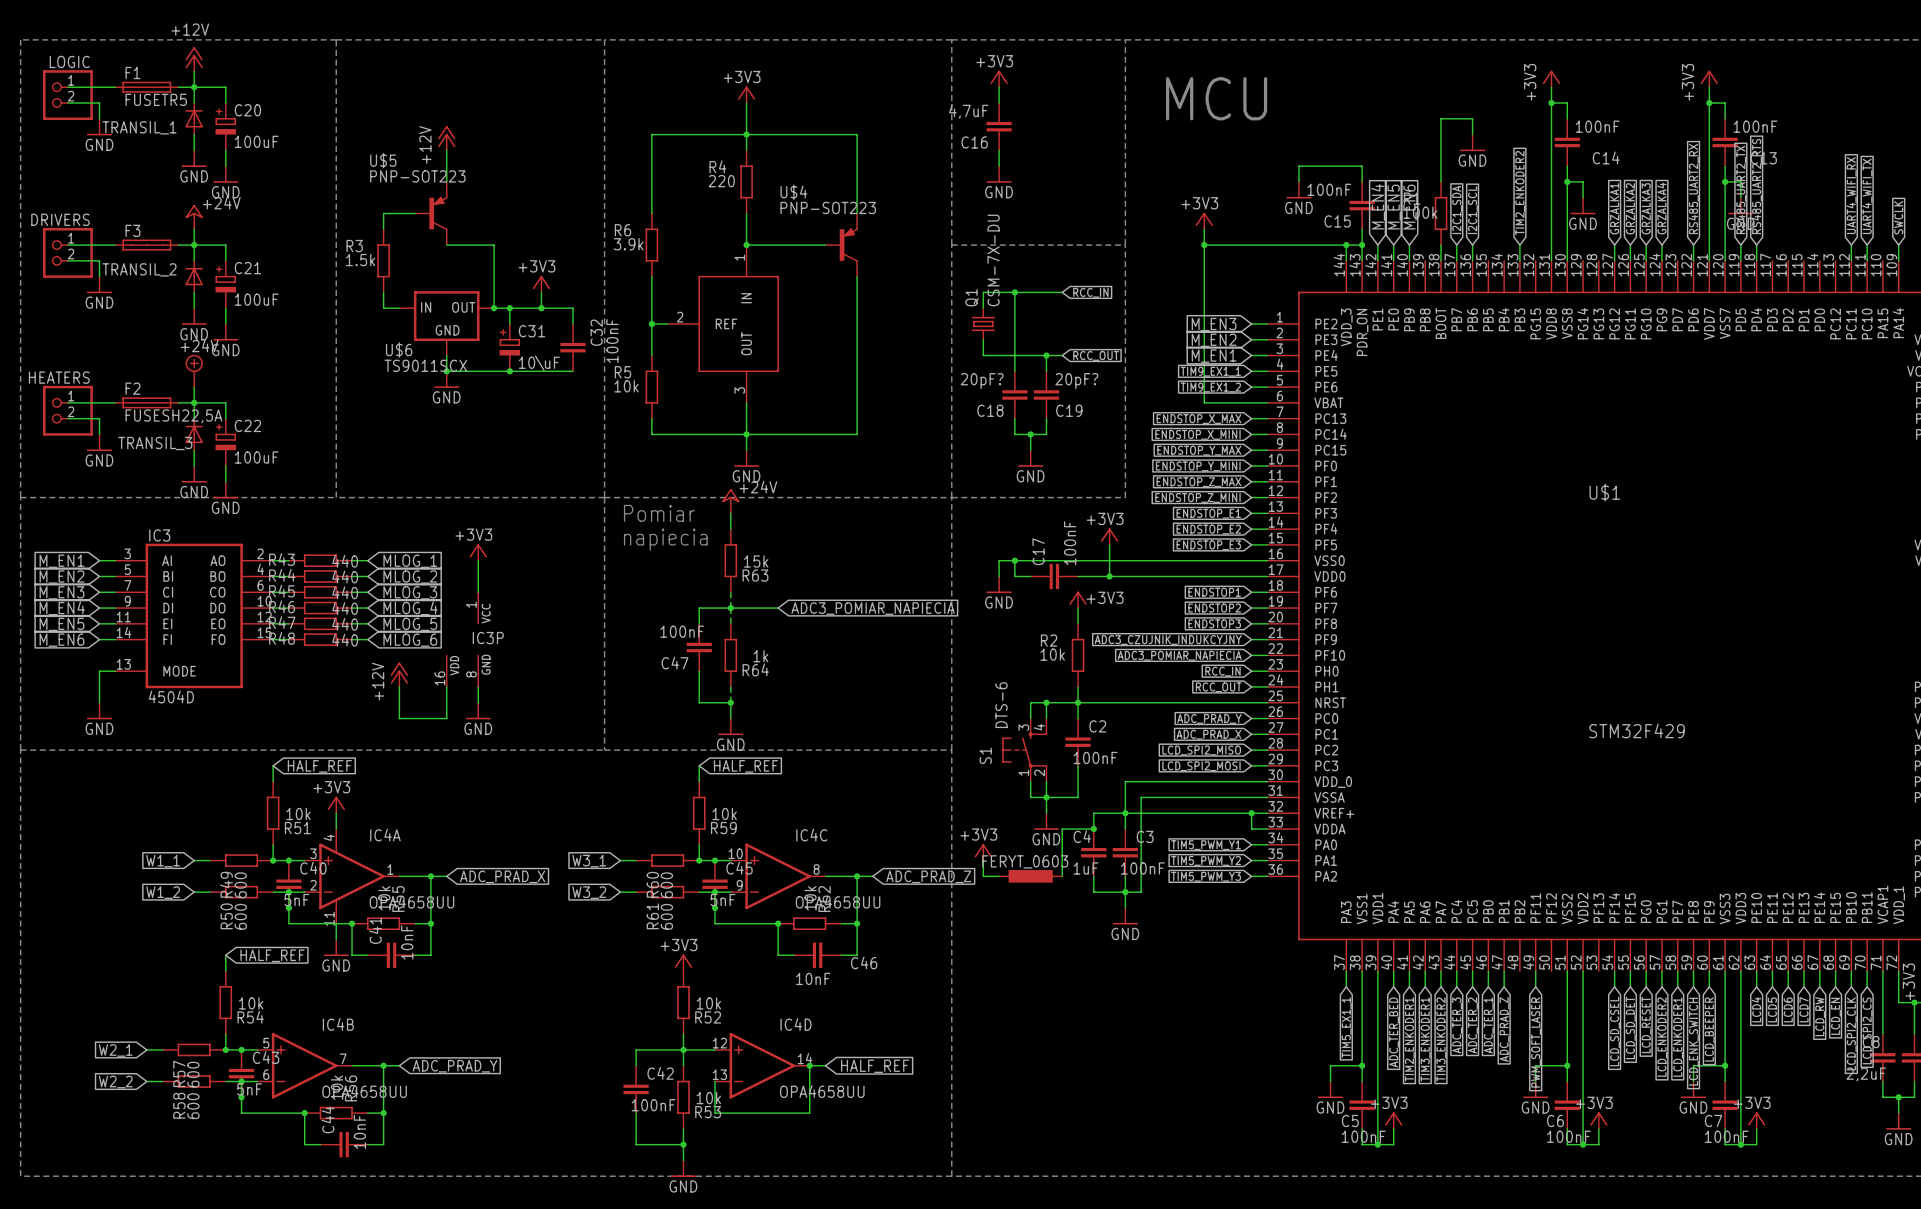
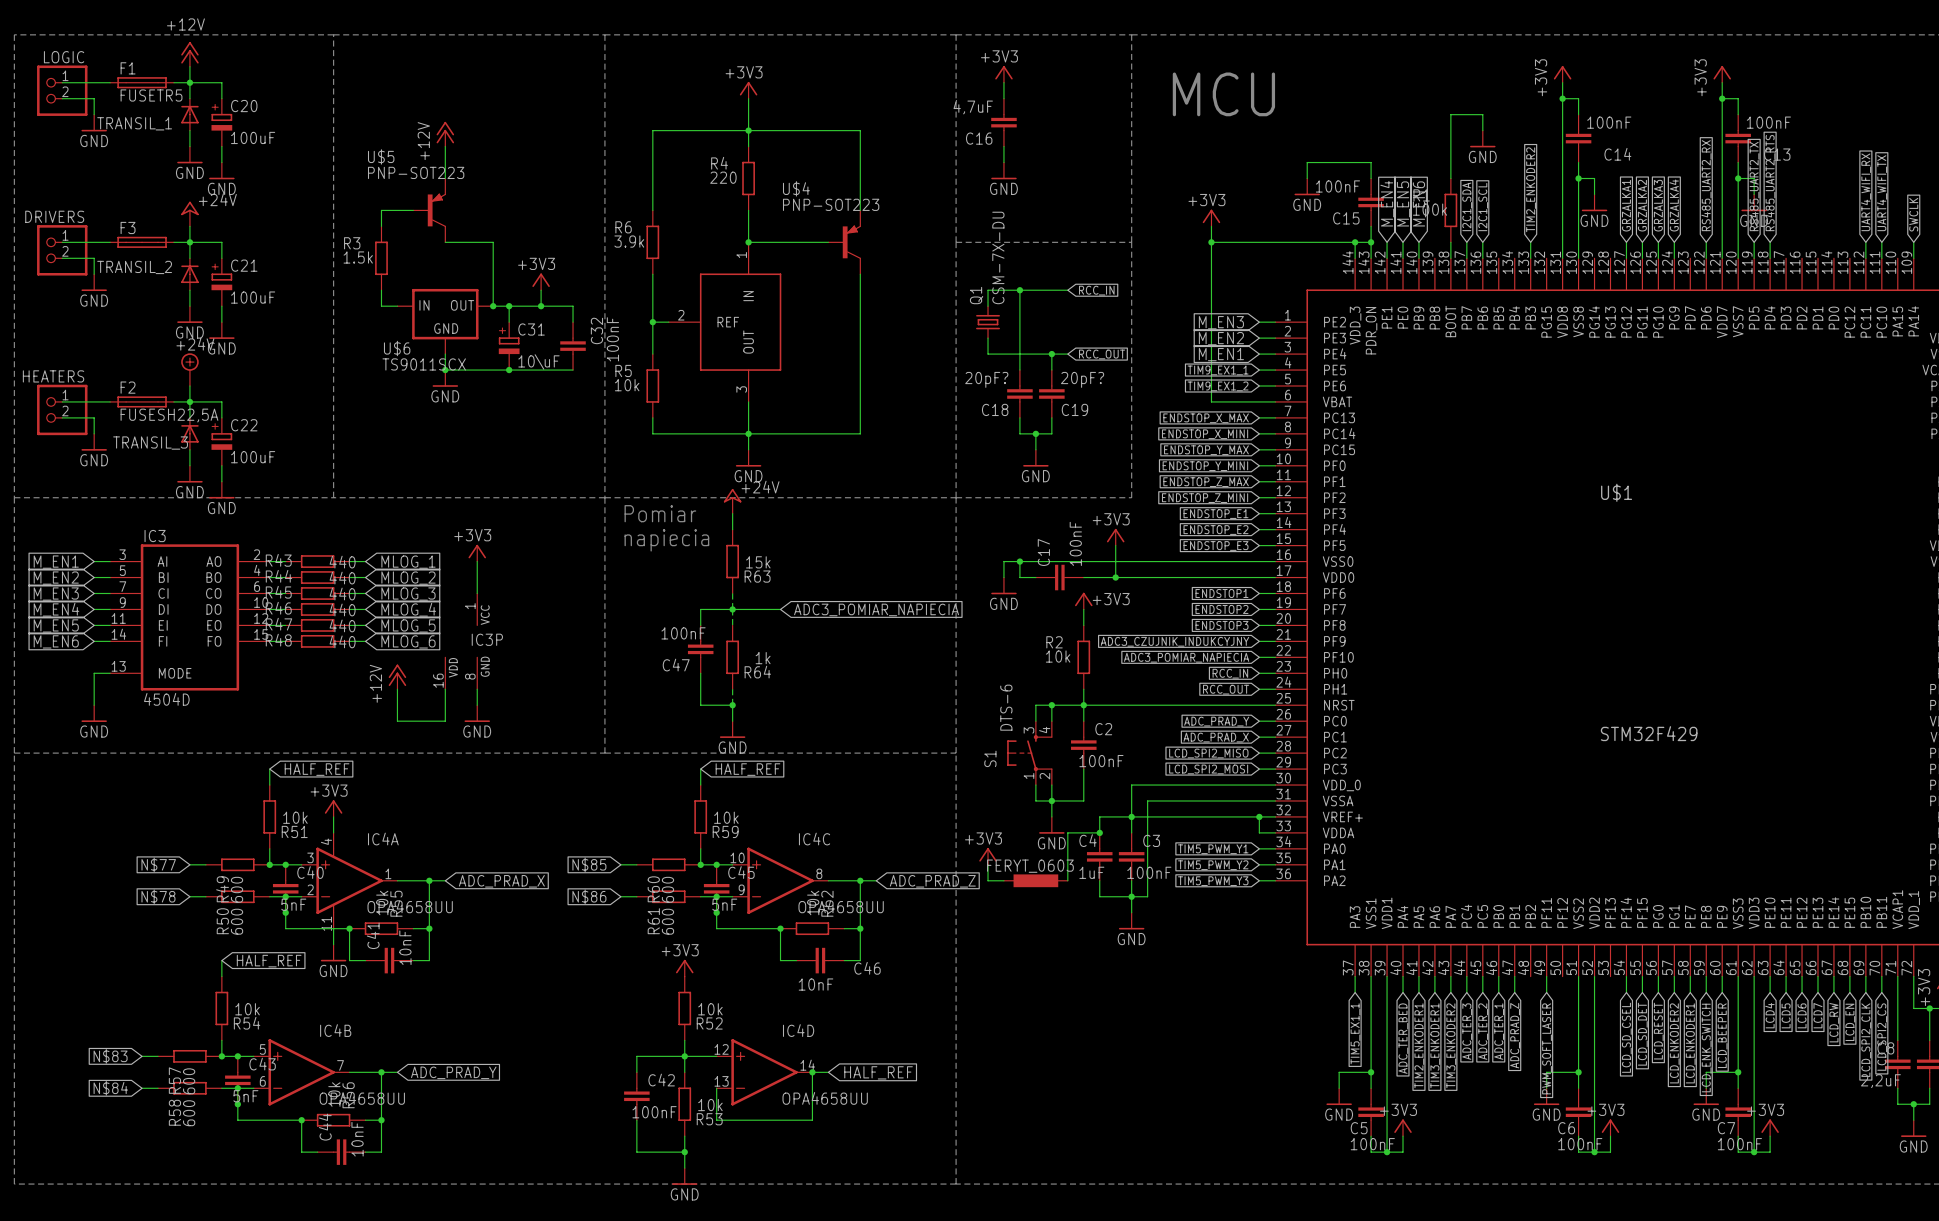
global label: W1_1 (163, 861) -> N$77 (158, 864)
global label: W3_1 (589, 861) -> N$85 (589, 864)
global label: W1_2 (163, 892) -> N$78 (158, 896)
global label: W3_2 (589, 892) -> N$86 (589, 896)
global label: W2_1 (115, 1050) -> N$83 (110, 1056)
global label: W2_2 (115, 1082) -> N$84 (110, 1088)

